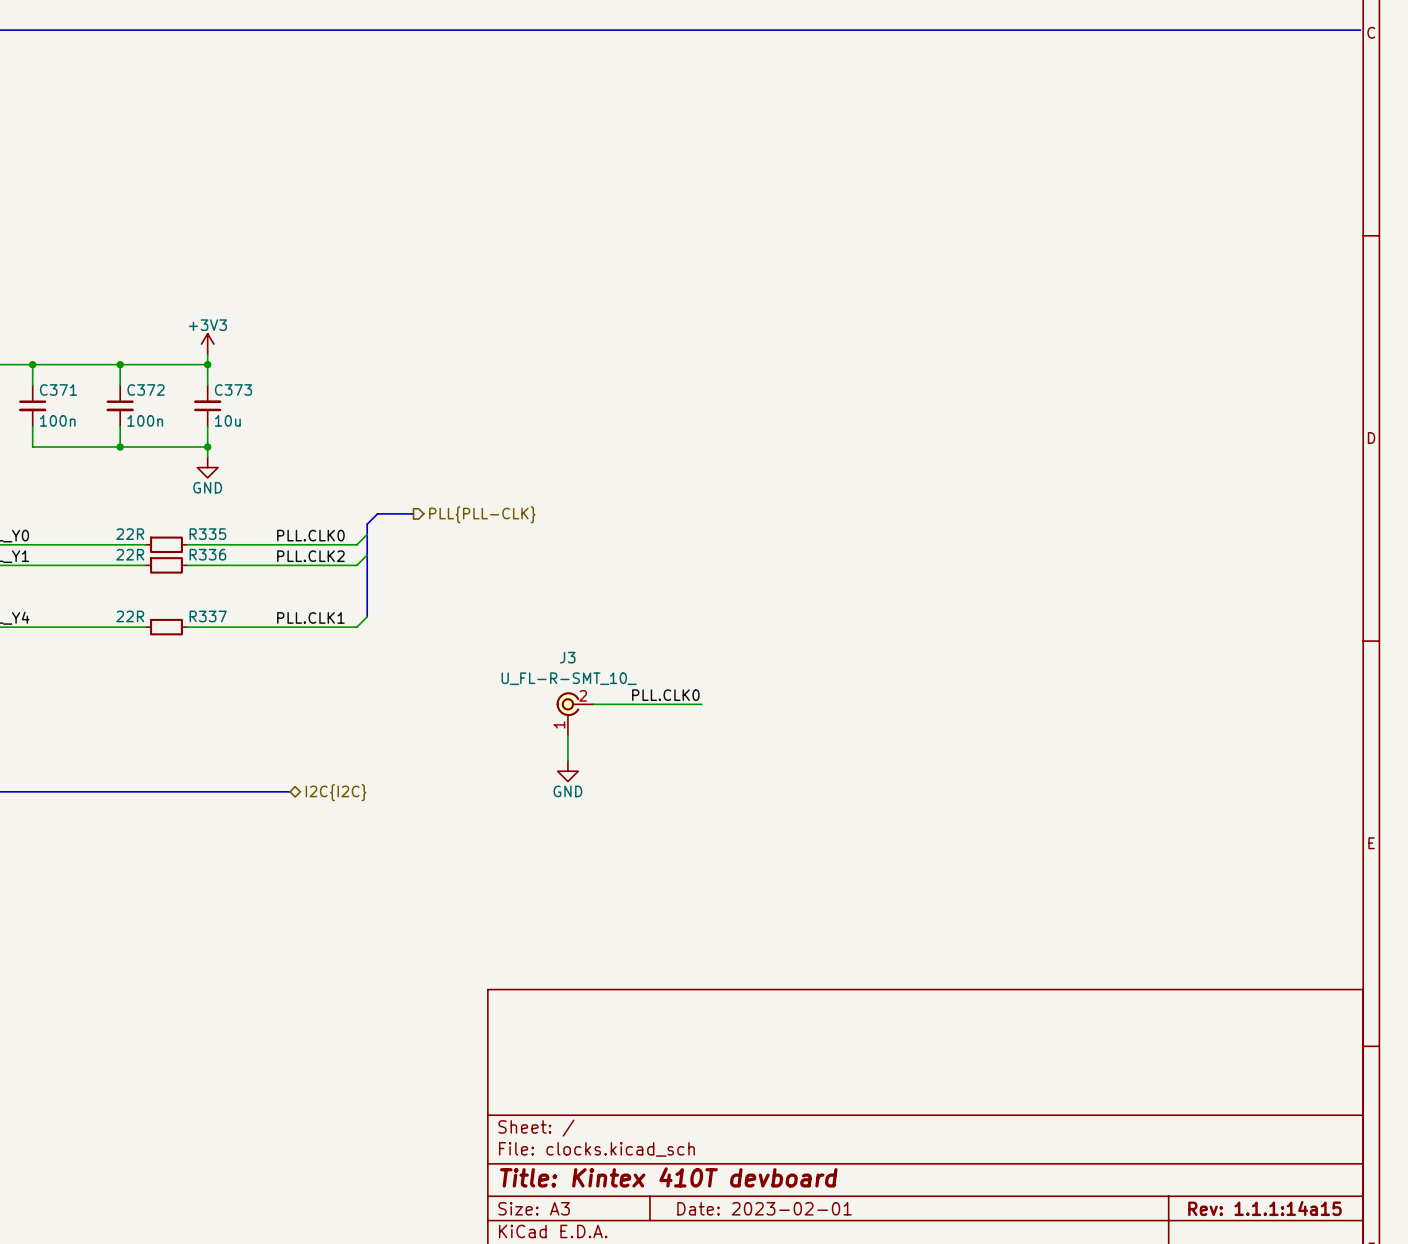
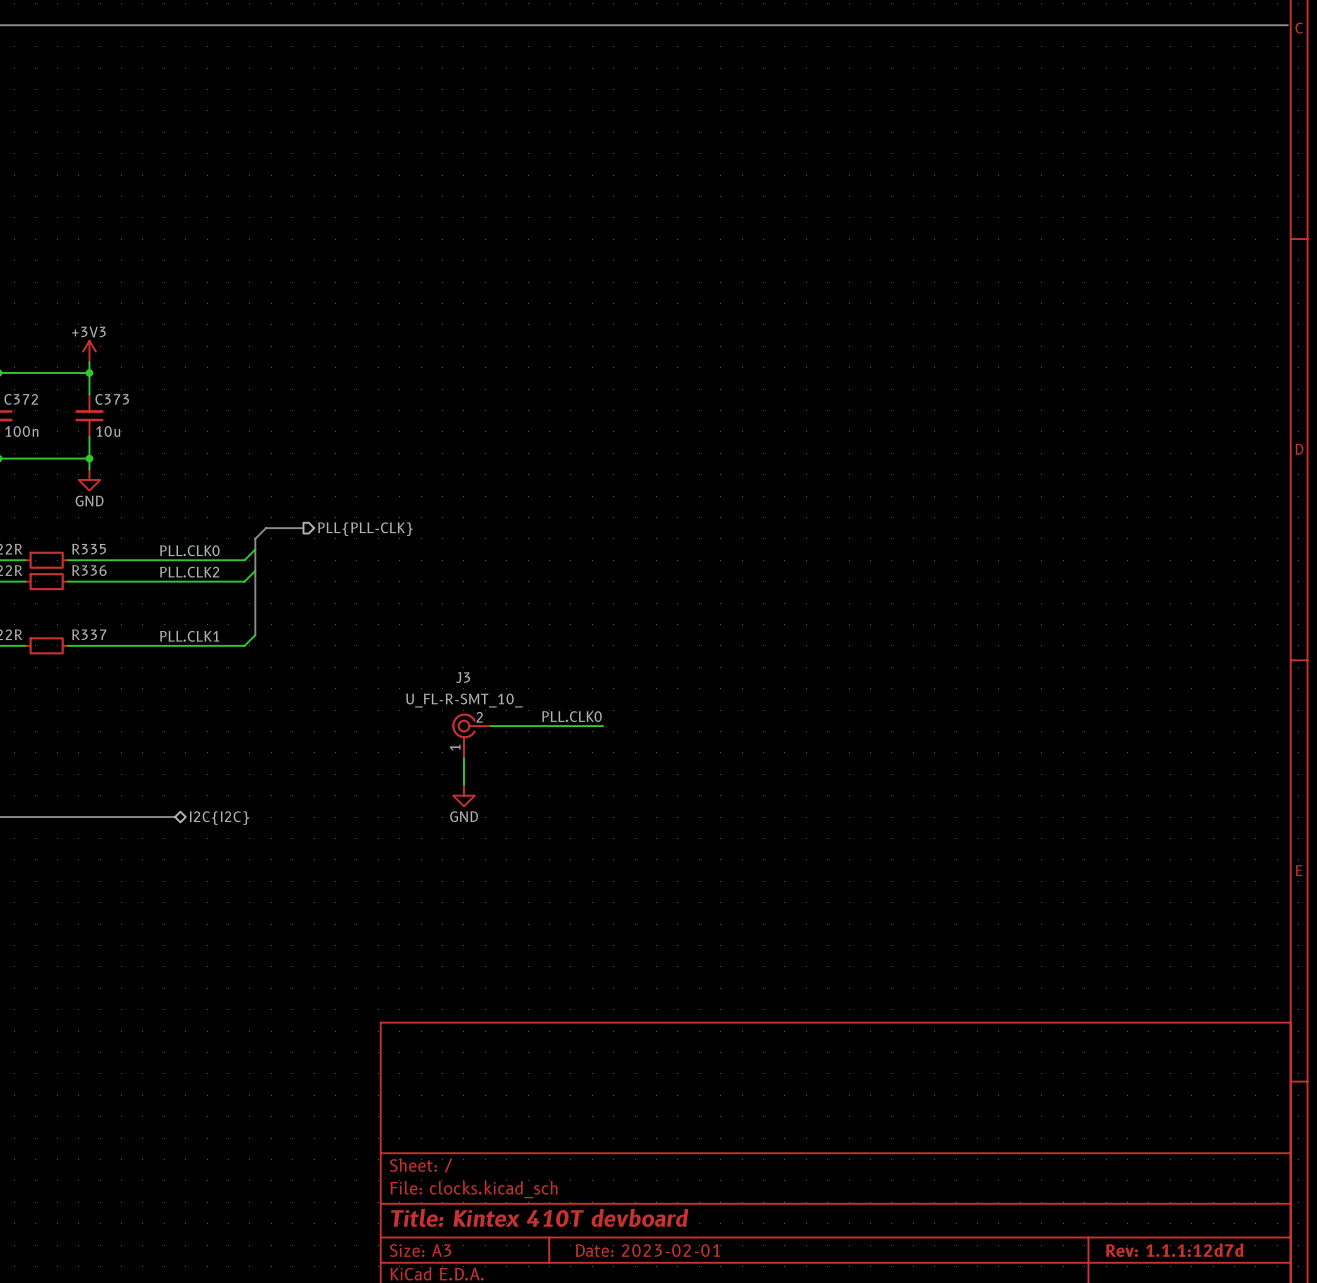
title block: Rev: 1.1.1:14a15 (1264, 1208) -> Rev: 1.1.1:12d7d (1174, 1250)

